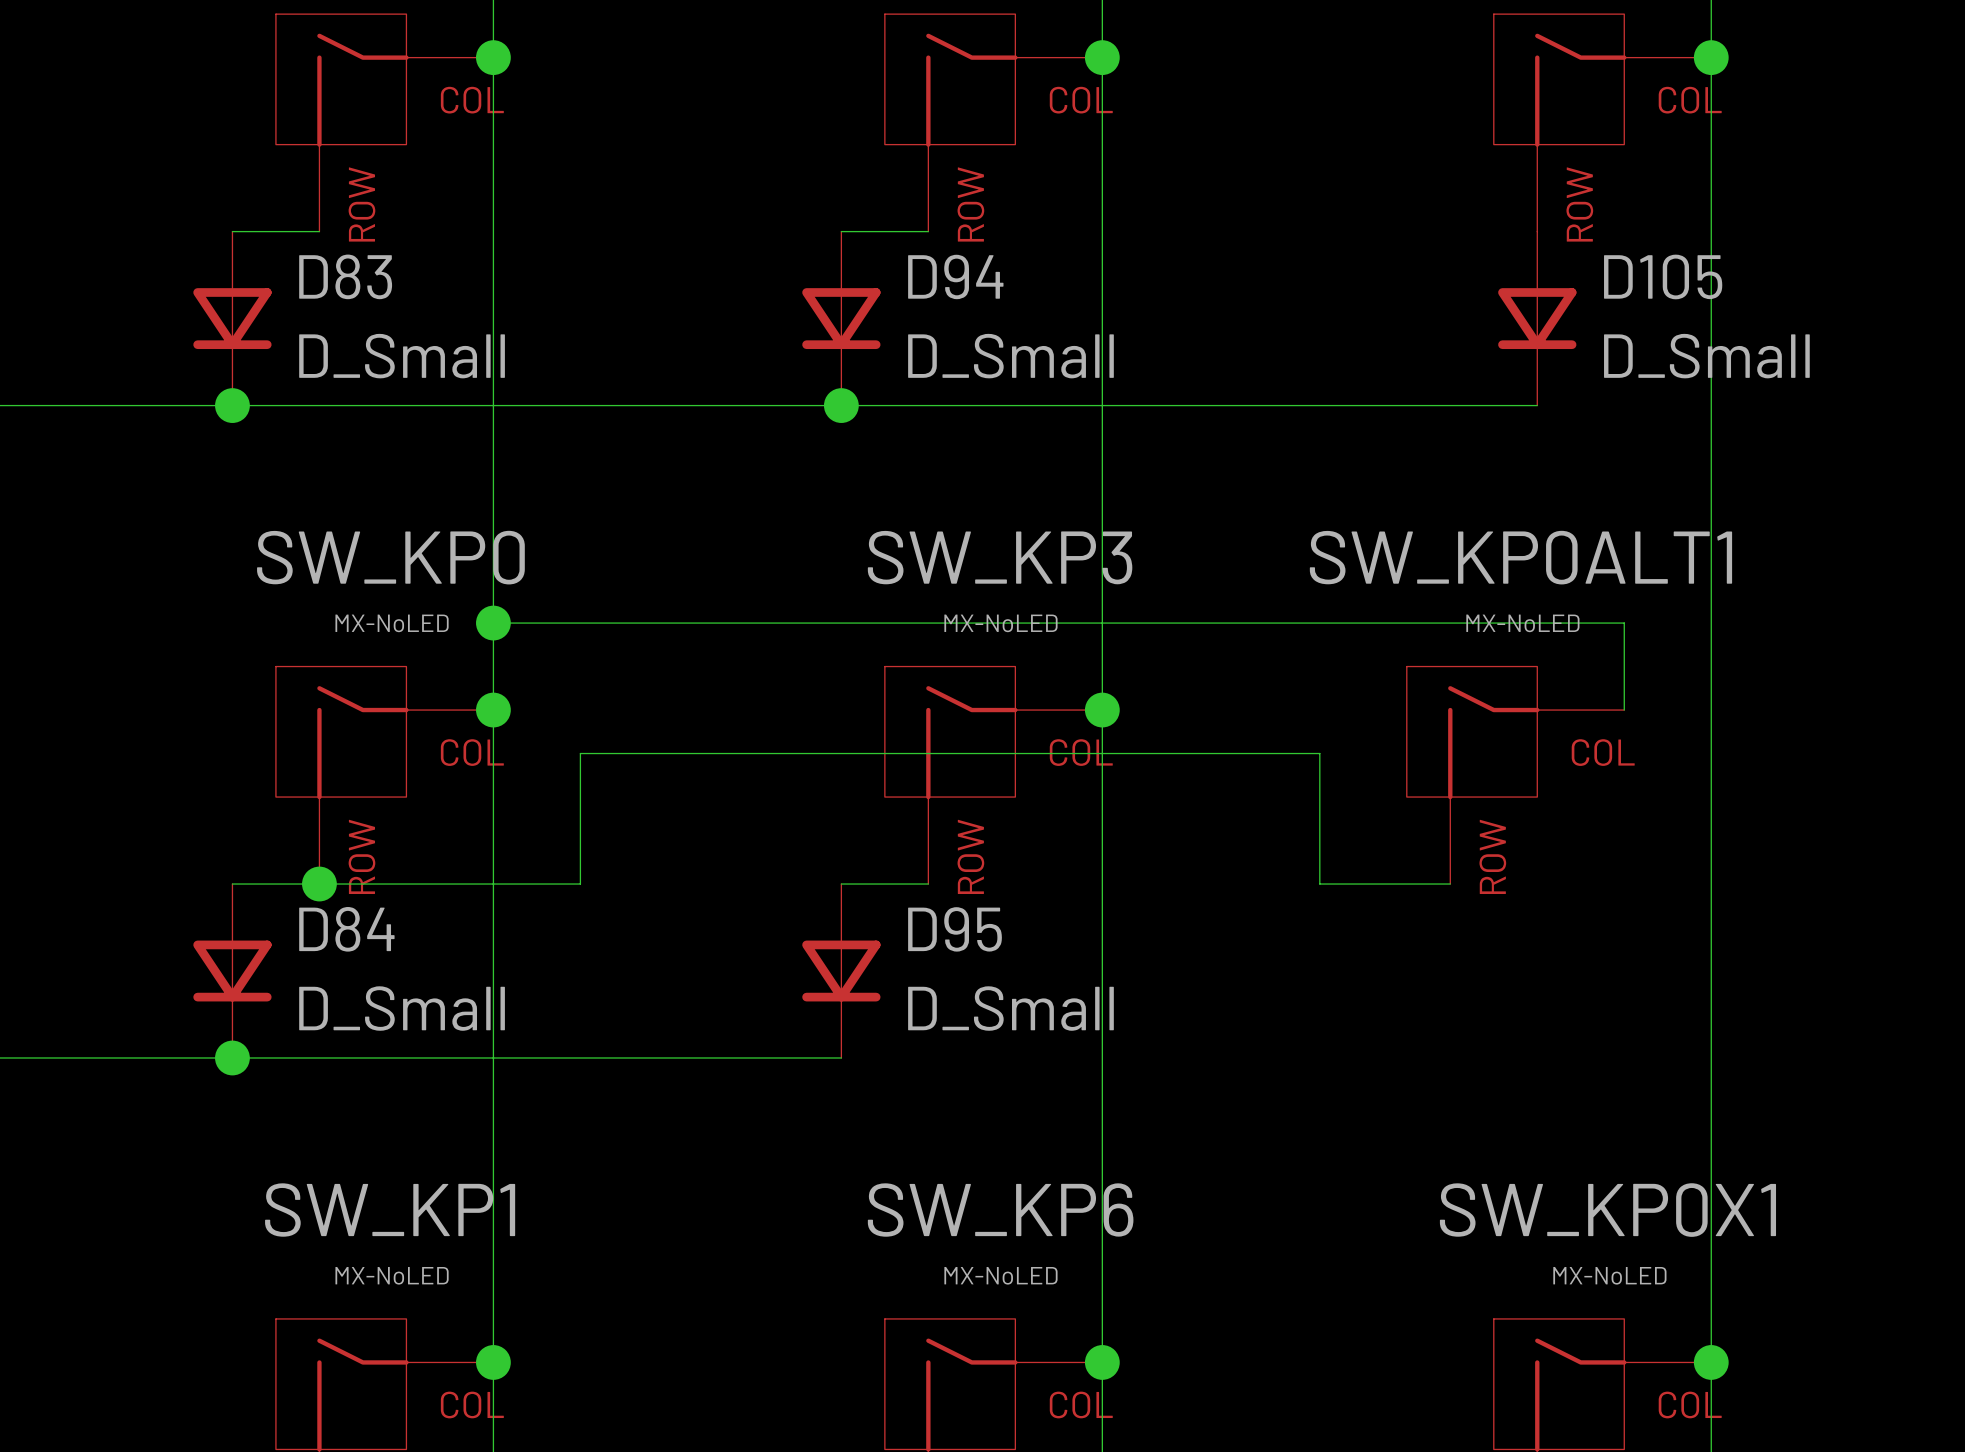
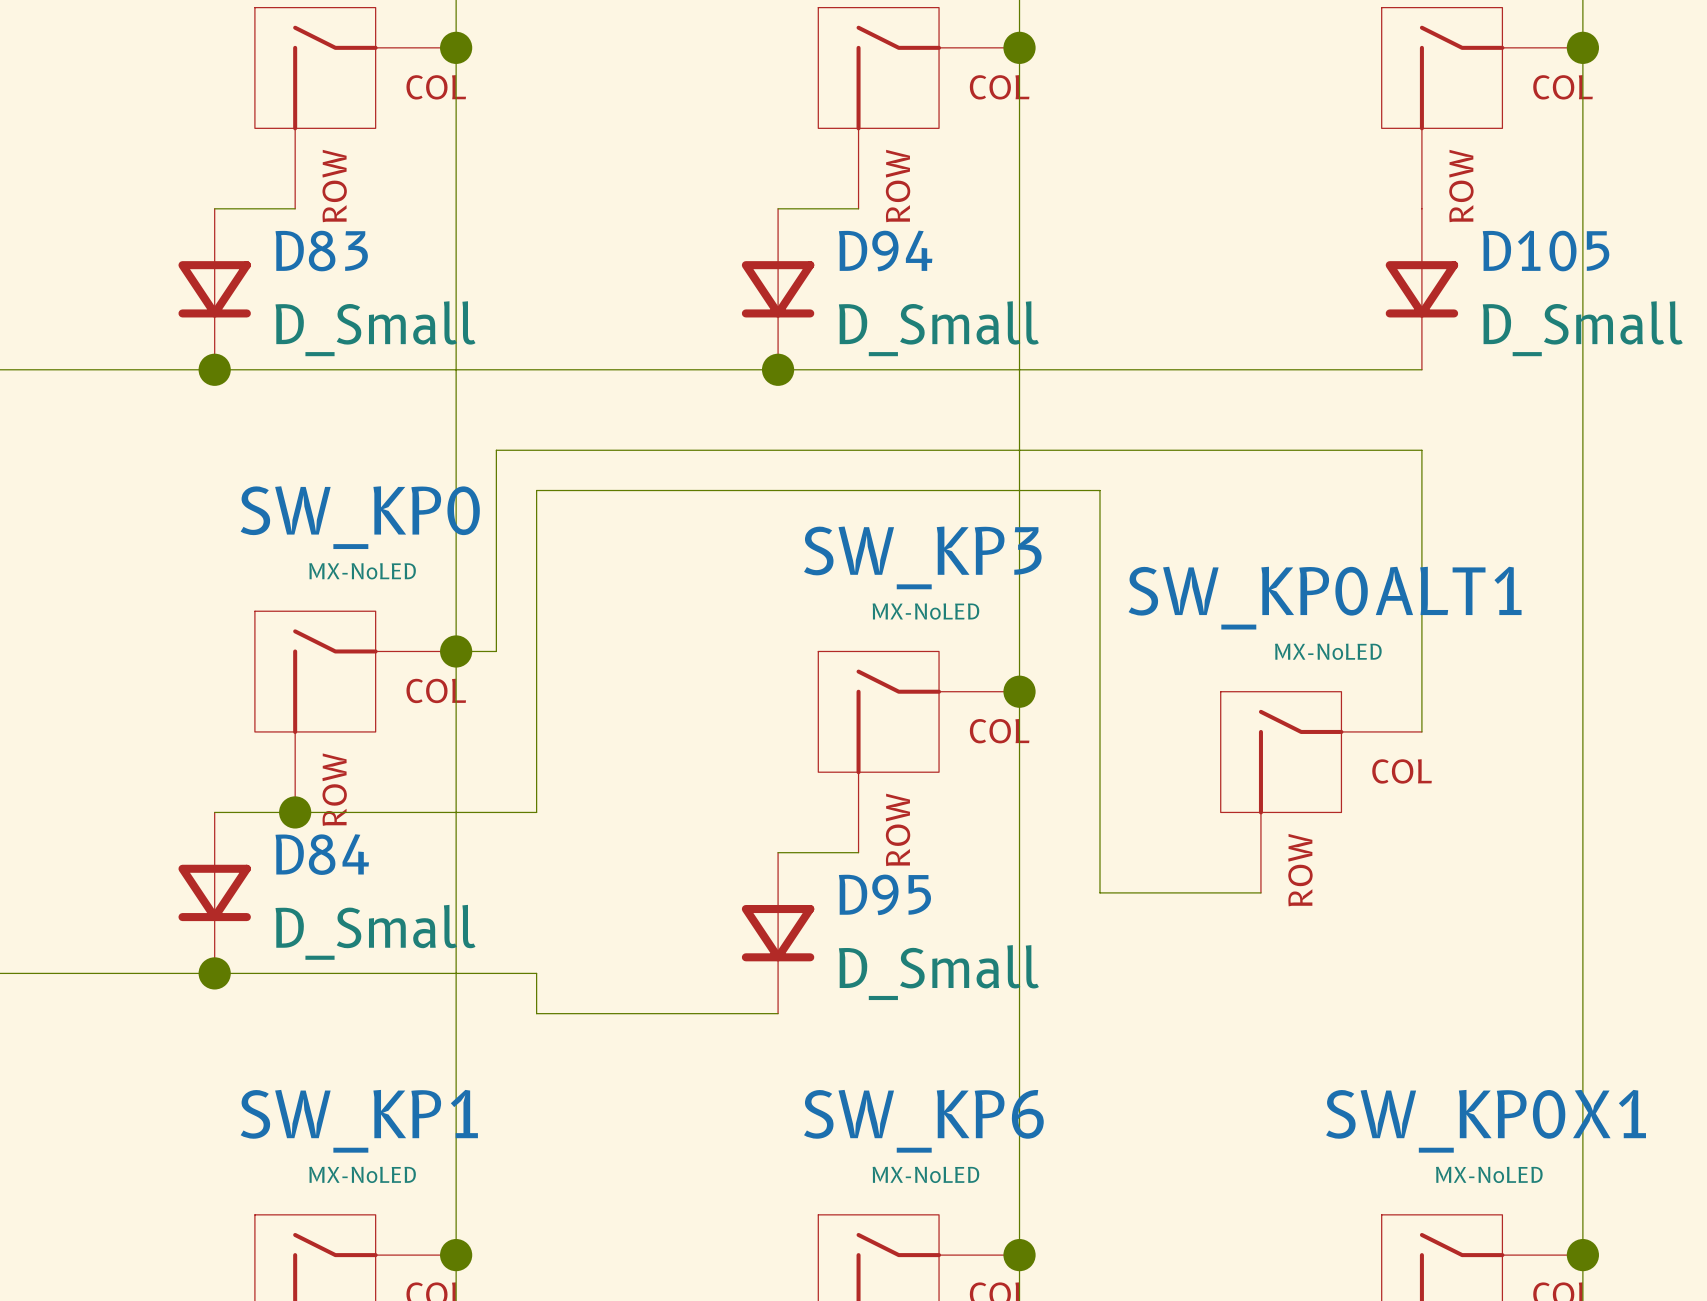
wire: (493, 623) (1624, 623) (1624, 710) -> none
junction: (493, 623) -> none
wire: none -> (456, 651) (496, 651) (496, 450) (1421, 450) (1421, 731)
junction position: (1102, 710) -> (1019, 691)
wire: (580, 753) (1319, 753) (1319, 884) (1450, 884) -> (536, 691) (536, 490) (1099, 490) (1099, 892) (1260, 892)
SW_KP3 position: (993, 775) -> (918, 752)
SW_KP0ALT1 position: (1515, 775) -> (1321, 792)
wire: (841, 884) (928, 884) -> (778, 852) (858, 852)
D95 position: (841, 971) -> (778, 933)
wire: (580, 1057) (841, 1057) -> (536, 973) (536, 1013) (778, 1013)

